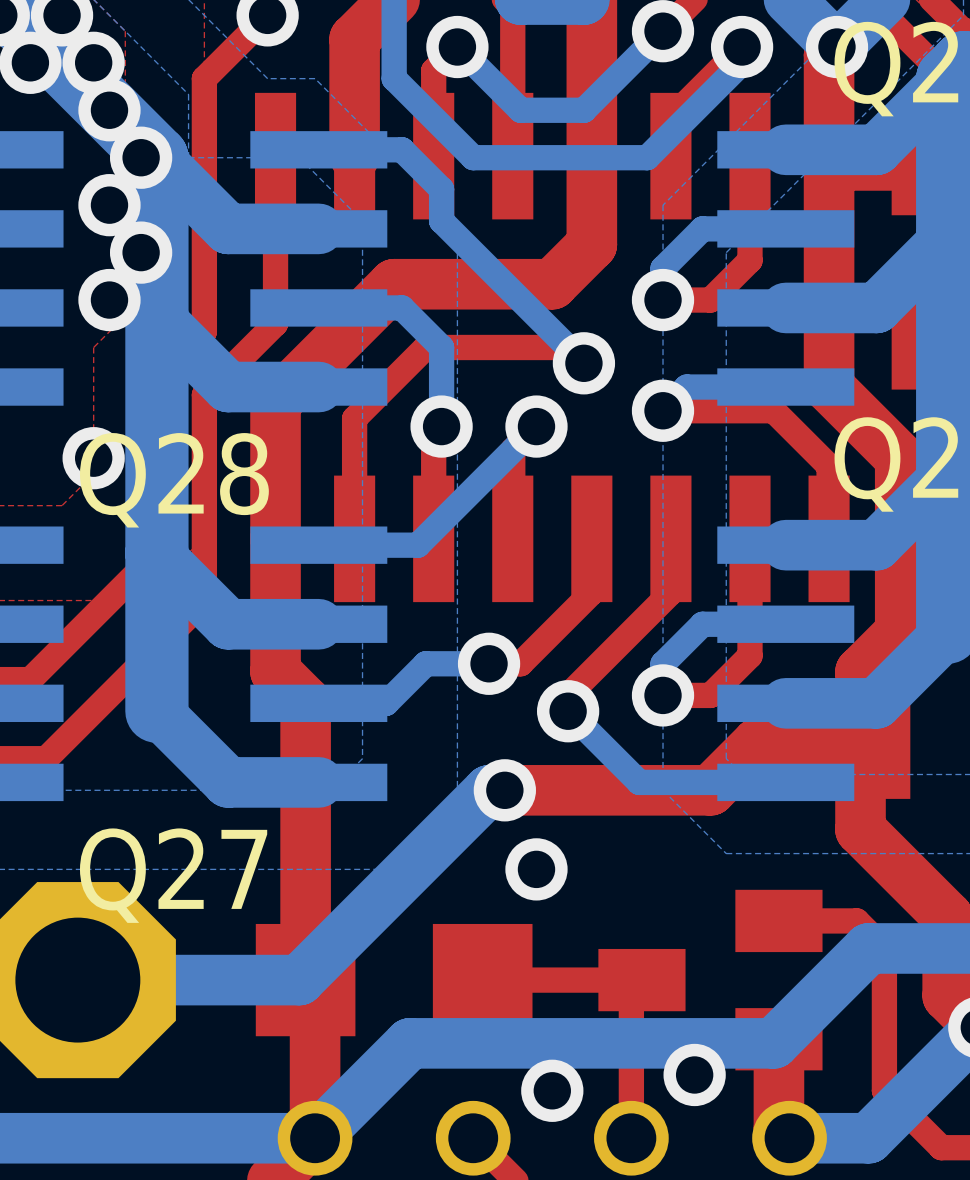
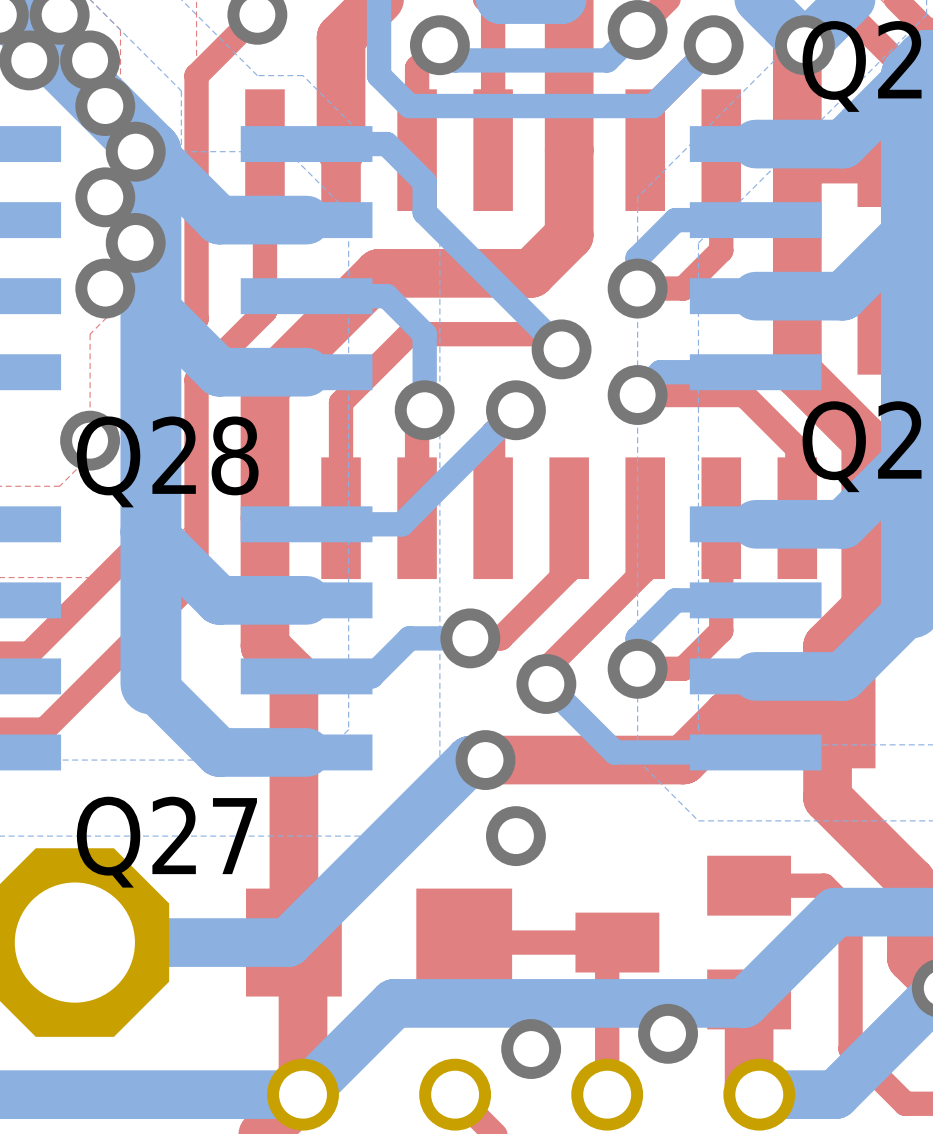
bottom track: (742, 47) (742, 62) (647, 157) (473, 157) (425, 110) -> none
bottom track: (473, 62) (520, 110) -> (409, 106) (500, 106)
bottom track: (631, 62) (583, 110) -> (713, 45) (652, 106) (561, 106)
bottom track: none -> (607, 60) (455, 60)

